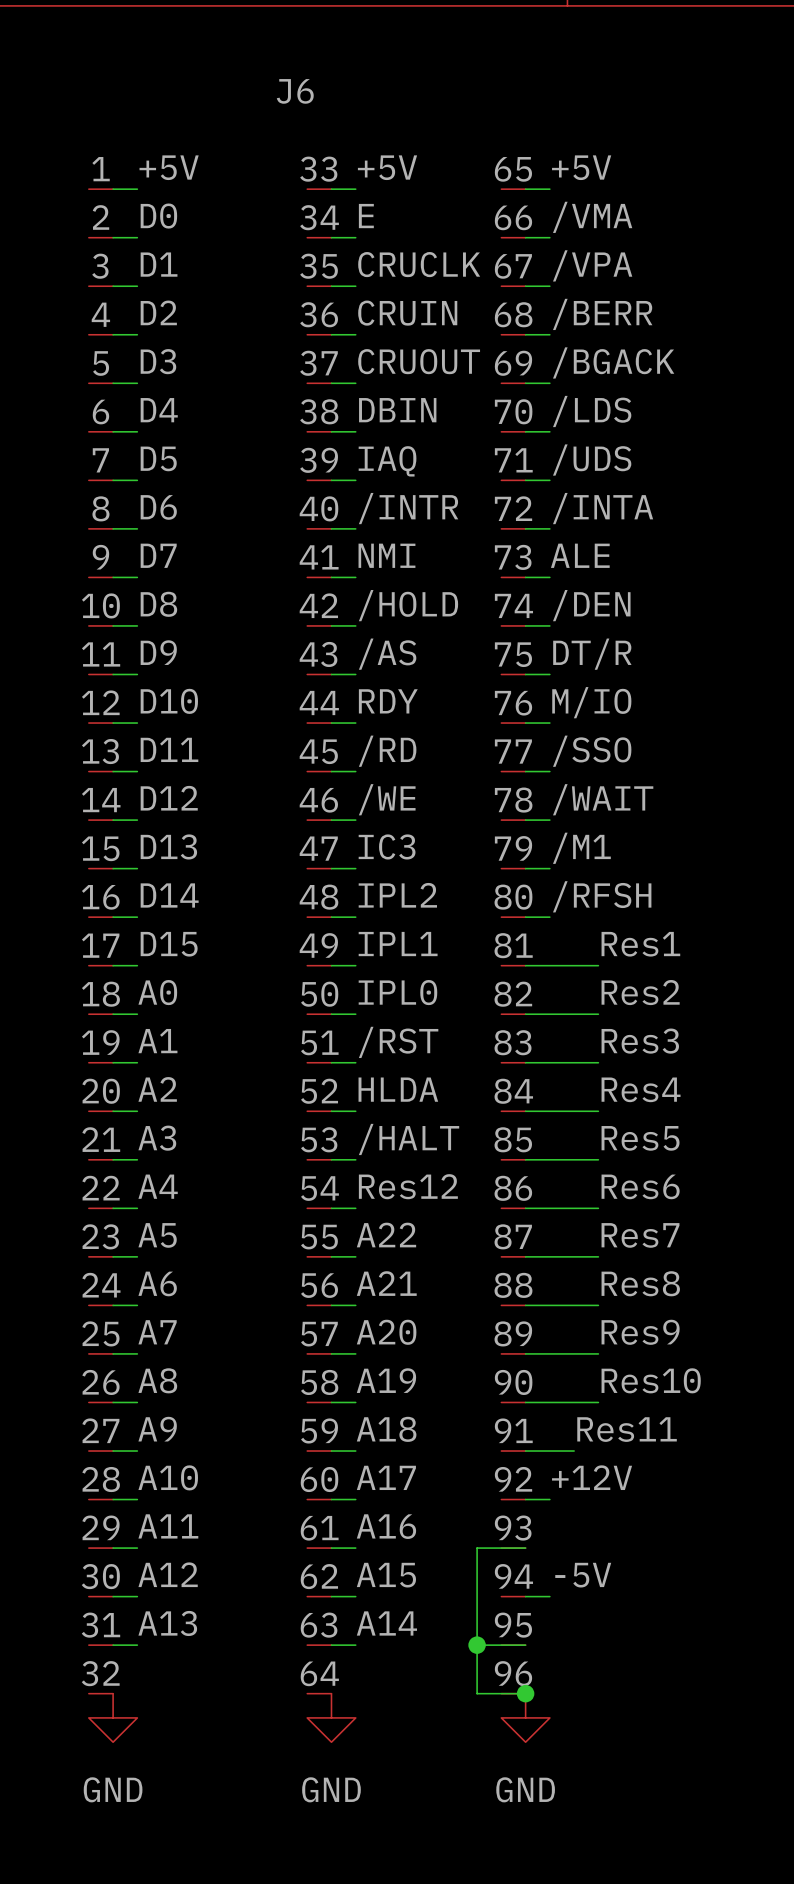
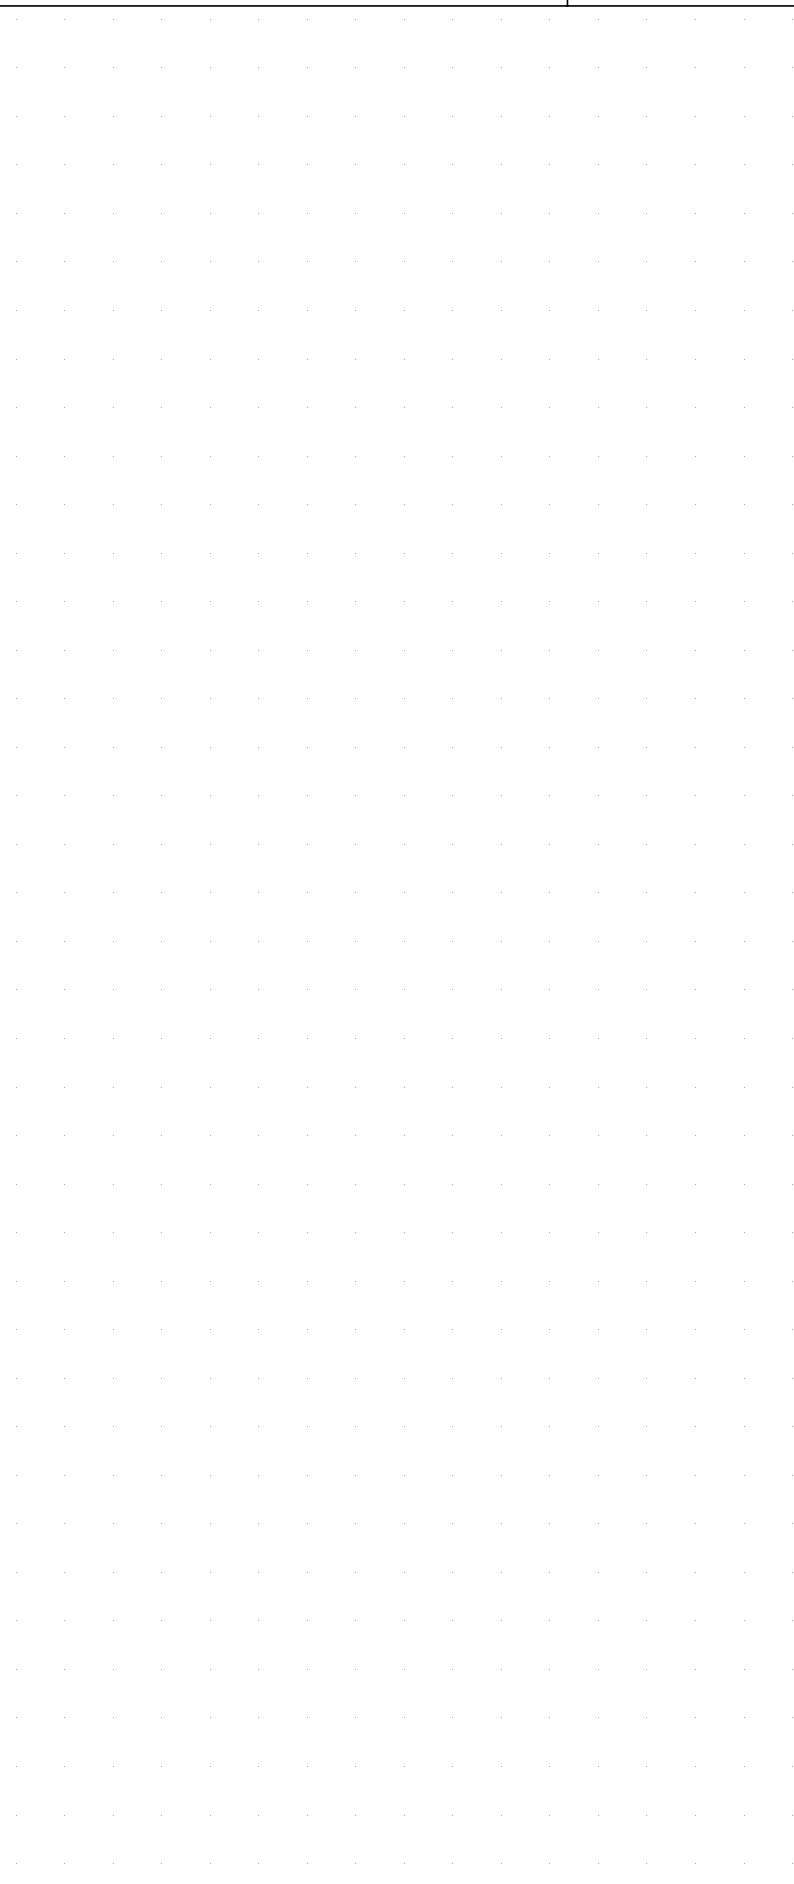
label: +5V (169, 167) -> none
label: +5V (387, 167) -> none
label: +5V (581, 167) -> none
wire: (113, 189) (137, 189) -> none
wire: (331, 189) (355, 189) -> none
wire: (525, 189) (549, 189) -> none
label: D0 (158, 216) -> none
label: E (366, 216) -> none
label: /VMA (592, 217) -> none
wire: (113, 237) (137, 237) -> none
wire: (331, 237) (355, 237) -> none
wire: (525, 237) (549, 237) -> none
label: D1 (159, 264) -> none
label: CRUCLK (419, 264) -> none
label: /VPA (592, 265) -> none
wire: (113, 286) (137, 286) -> none
wire: (331, 286) (355, 286) -> none
wire: (525, 286) (549, 286) -> none
label: D2 (158, 312) -> none
label: CRUIN (407, 313) -> none
label: /BERR (602, 314) -> none
wire: (113, 334) (137, 334) -> none
wire: (331, 334) (355, 334) -> none
wire: (525, 334) (549, 334) -> none
label: D3 (158, 361) -> none
label: CRUOUT (419, 361) -> none
label: /BGACK (613, 362) -> none
wire: (113, 383) (137, 383) -> none
wire: (331, 383) (355, 383) -> none
wire: (525, 383) (549, 383) -> none
label: D4 (159, 410) -> none
label: DBIN (397, 410) -> none
label: /LDS (592, 411) -> none
wire: (113, 431) (137, 431) -> none
wire: (331, 431) (355, 431) -> none
wire: (525, 431) (549, 431) -> none
label: D5 (158, 458) -> none
label: /UDS (592, 460) -> none
label: IAQ (387, 461) -> none
wire: (113, 480) (137, 480) -> none
wire: (331, 480) (355, 480) -> none
wire: (525, 480) (549, 480) -> none
label: D6 (158, 507) -> none
label: /INTR (408, 508) -> none
label: /INTA (603, 508) -> none
wire: (113, 528) (137, 528) -> none
wire: (331, 528) (355, 528) -> none
wire: (525, 528) (549, 528) -> none
label: D7 (158, 555) -> none
label: NMI (386, 555) -> none
label: ALE (580, 555) -> none
wire: (113, 577) (137, 577) -> none
wire: (331, 577) (355, 577) -> none
wire: (525, 577) (549, 577) -> none
label: D8 (158, 604) -> none
label: /HOLD (408, 605) -> none
label: /DEN (591, 605) -> none
wire: (113, 625) (137, 625) -> none
wire: (331, 625) (355, 625) -> none
wire: (525, 625) (549, 625) -> none
label: D9 (158, 652) -> none
label: /AS (387, 654) -> none
label: DT/R (592, 654) -> none
wire: (113, 674) (137, 674) -> none
wire: (331, 674) (355, 674) -> none
wire: (525, 674) (549, 674) -> none
label: D10 (169, 701) -> none
label: RDY (388, 701) -> none
label: M/IO (591, 702) -> none
wire: (113, 723) (137, 723) -> none
wire: (331, 723) (355, 723) -> none
wire: (525, 723) (549, 723) -> none
label: D11 (169, 749) -> none
label: /RD (387, 751) -> none
label: /SSO (592, 751) -> none
wire: (113, 771) (137, 771) -> none
wire: (331, 771) (355, 771) -> none
wire: (525, 771) (549, 771) -> none
label: D12 (169, 798) -> none
label: /WE (387, 799) -> none
label: /WAIT (603, 799) -> none
wire: (113, 820) (137, 820) -> none
wire: (331, 820) (355, 820) -> none
wire: (525, 820) (549, 820) -> none
label: D13 (168, 846) -> none
label: IC3 (387, 846) -> none
label: /M1 (581, 848) -> none
wire: (113, 868) (137, 868) -> none
wire: (331, 868) (355, 868) -> none
wire: (525, 868) (549, 868) -> none
label: D14 (169, 895) -> none
label: IPL2 (397, 895) -> none
label: /RFSH (602, 896) -> none
wire: (113, 917) (137, 917) -> none
wire: (331, 917) (355, 917) -> none
wire: (525, 917) (549, 917) -> none
J6: (307, 941) -> none
label: D15 (169, 944) -> none
label: IPL1 (398, 944) -> none
label: Res1 (640, 944) -> none
wire: (113, 965) (137, 965) -> none
wire: (331, 965) (355, 965) -> none
wire: (525, 965) (598, 965) -> none
label: A0 (157, 992) -> none
label: IPL0 (397, 992) -> none
label: Res2 (640, 992) -> none
wire: (113, 1014) (137, 1014) -> none
wire: (331, 1014) (355, 1014) -> none
wire: (525, 1014) (598, 1014) -> none
label: A1 (157, 1041) -> none
label: Res3 (640, 1041) -> none
label: /RST (398, 1042) -> none
wire: (113, 1062) (137, 1062) -> none
wire: (331, 1062) (355, 1062) -> none
wire: (525, 1062) (598, 1062) -> none
label: A2 (157, 1089) -> none
label: HLDA (398, 1089) -> none
label: Res4 (641, 1089) -> none
wire: (113, 1111) (137, 1111) -> none
wire: (331, 1111) (355, 1111) -> none
wire: (525, 1111) (598, 1111) -> none
label: A3 (157, 1138) -> none
label: Res5 (640, 1138) -> none
label: /HALT (409, 1139) -> none
wire: (113, 1159) (137, 1159) -> none
wire: (331, 1159) (355, 1159) -> none
wire: (525, 1159) (598, 1159) -> none
label: A4 (158, 1186) -> none
label: Res12 (408, 1186) -> none
label: Res6 (640, 1186) -> none
wire: (113, 1208) (137, 1208) -> none
wire: (331, 1208) (355, 1208) -> none
wire: (525, 1208) (598, 1208) -> none
label: A5 (157, 1235) -> none
label: A22 (386, 1235) -> none
label: Res7 (640, 1235) -> none
wire: (113, 1256) (137, 1256) -> none
wire: (331, 1256) (355, 1256) -> none
wire: (525, 1256) (598, 1256) -> none
label: A6 (157, 1283) -> none
label: A21 (386, 1283) -> none
label: Res8 (640, 1283) -> none
wire: (113, 1305) (137, 1305) -> none
wire: (331, 1305) (355, 1305) -> none
wire: (525, 1305) (598, 1305) -> none
label: A7 (157, 1332) -> none
label: A20 (386, 1332) -> none
label: Res9 (640, 1332) -> none
wire: (113, 1353) (137, 1353) -> none
wire: (331, 1353) (355, 1353) -> none
wire: (525, 1353) (598, 1353) -> none
label: A8 (157, 1380) -> none
label: A19 (386, 1380) -> none
label: Res10 (651, 1380) -> none
wire: (113, 1402) (137, 1402) -> none
wire: (331, 1402) (355, 1402) -> none
wire: (525, 1402) (598, 1402) -> none
label: A9 (157, 1429) -> none
label: A18 (386, 1429) -> none
label: Res11 (627, 1429) -> none
wire: (113, 1451) (137, 1451) -> none
wire: (331, 1451) (355, 1451) -> none
wire: (525, 1451) (574, 1451) -> none
label: A10 (168, 1477) -> none
label: A17 (386, 1477) -> none
label: +12V (592, 1477) -> none
wire: (113, 1499) (137, 1499) -> none
wire: (331, 1499) (355, 1499) -> none
wire: (525, 1499) (549, 1499) -> none
label: A11 (168, 1526) -> none
label: A16 (386, 1526) -> none
wire: (113, 1548) (137, 1548) -> none
wire: (331, 1548) (355, 1548) -> none
wire: (525, 1548) (477, 1548) (477, 1693) (525, 1693) -> none
label: A12 (168, 1574) -> none
label: A15 (386, 1575) -> none
label: -5V (583, 1575) -> none
wire: (113, 1596) (137, 1596) -> none
wire: (331, 1596) (355, 1596) -> none
wire: (525, 1596) (549, 1596) -> none
label: A13 (167, 1623) -> none
label: A14 (386, 1623) -> none
wire: (113, 1645) (137, 1645) -> none
wire: (331, 1645) (355, 1645) -> none
wire: (477, 1645) (525, 1645) -> none
junction: (477, 1645) -> none
junction: (525, 1693) -> none
power symbol: GND (113, 1717) -> none
power symbol: GND (331, 1717) -> none
power symbol: GND (525, 1717) -> none

